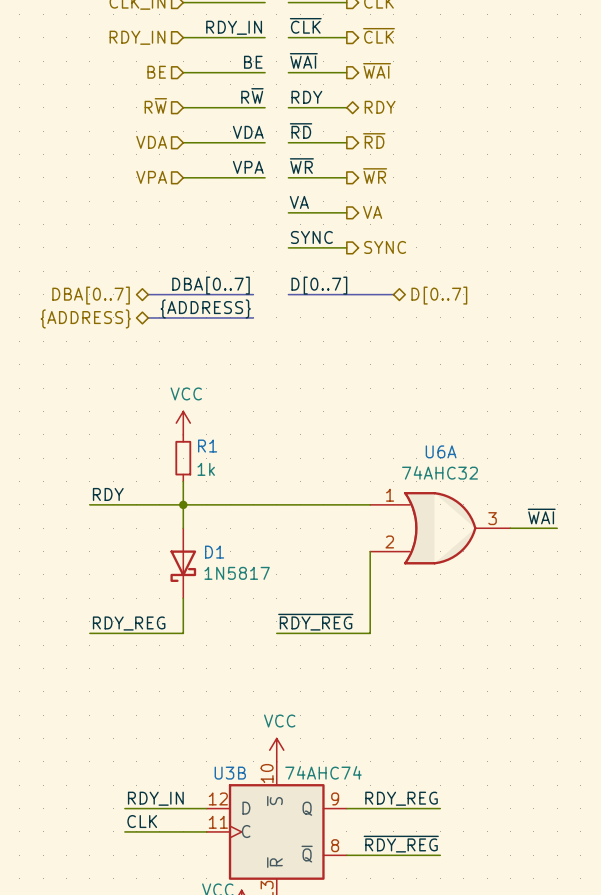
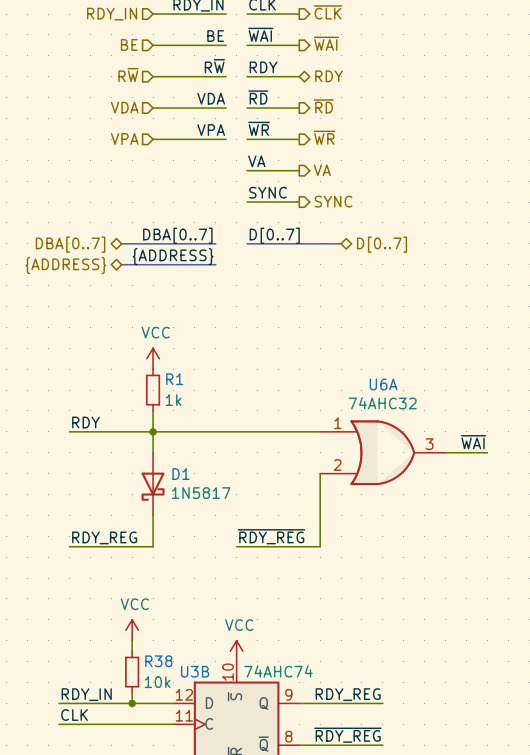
power symbol: none -> VCC (132, 630)
wire: none -> (132, 640) (132, 651)
R38: none -> 10k (132, 672)
wire: none -> (132, 692) (132, 703)
label position: RDY_IN (155, 798) -> RDY_IN (86, 694)
wire: none -> (59, 703) (100, 703)
junction: none -> (132, 703)
label position: CLK (142, 821) -> CLK (74, 715)
wire: none -> (59, 724) (100, 724)

